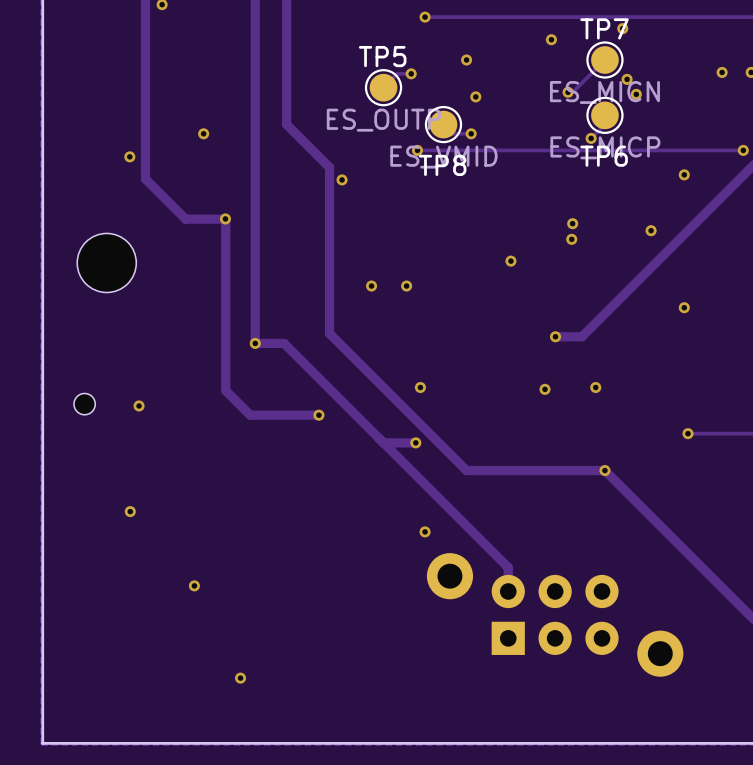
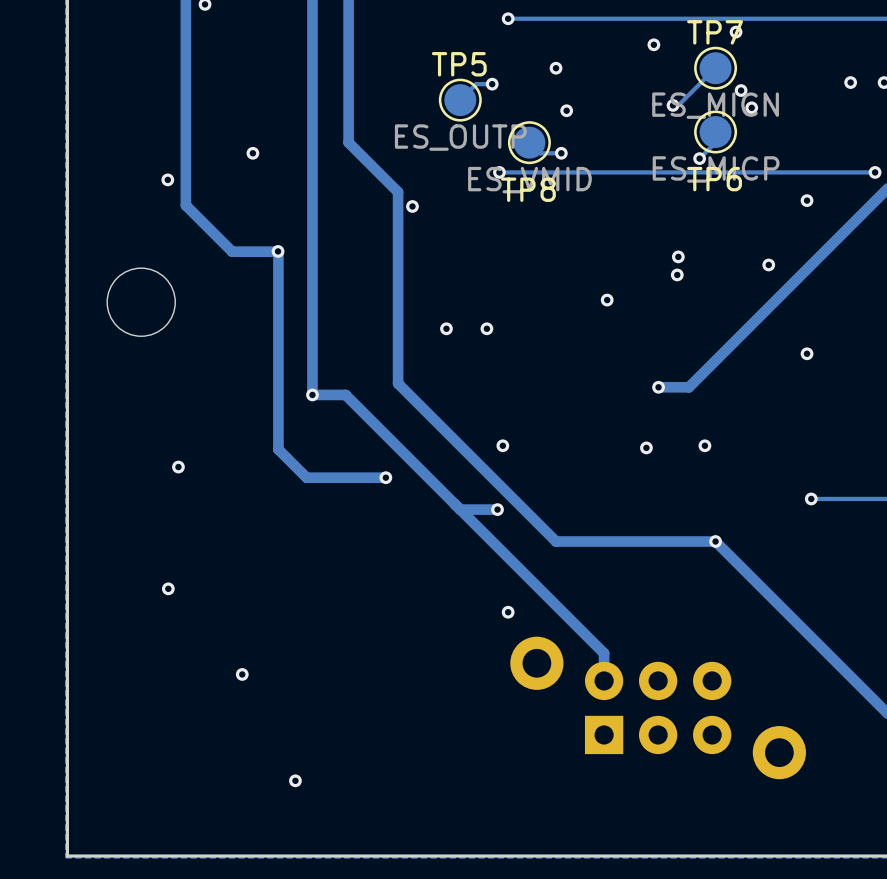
part: (84, 404) -> none

